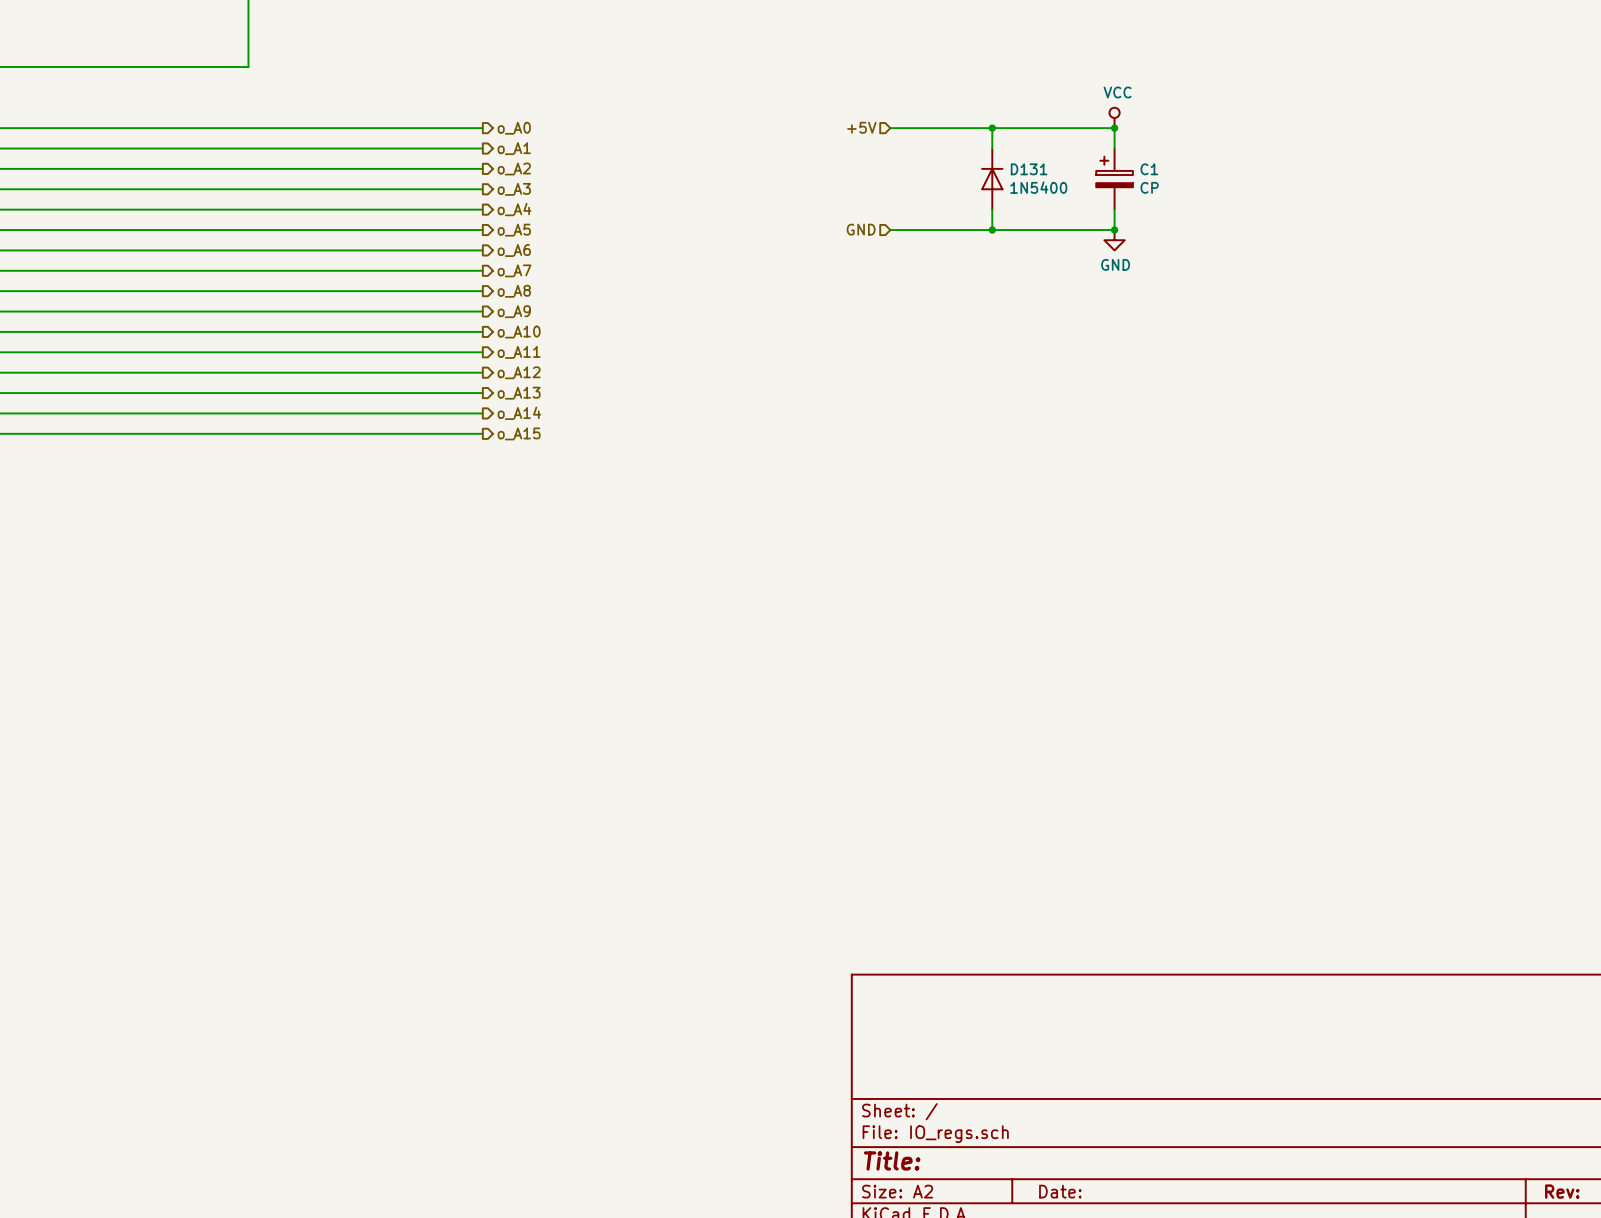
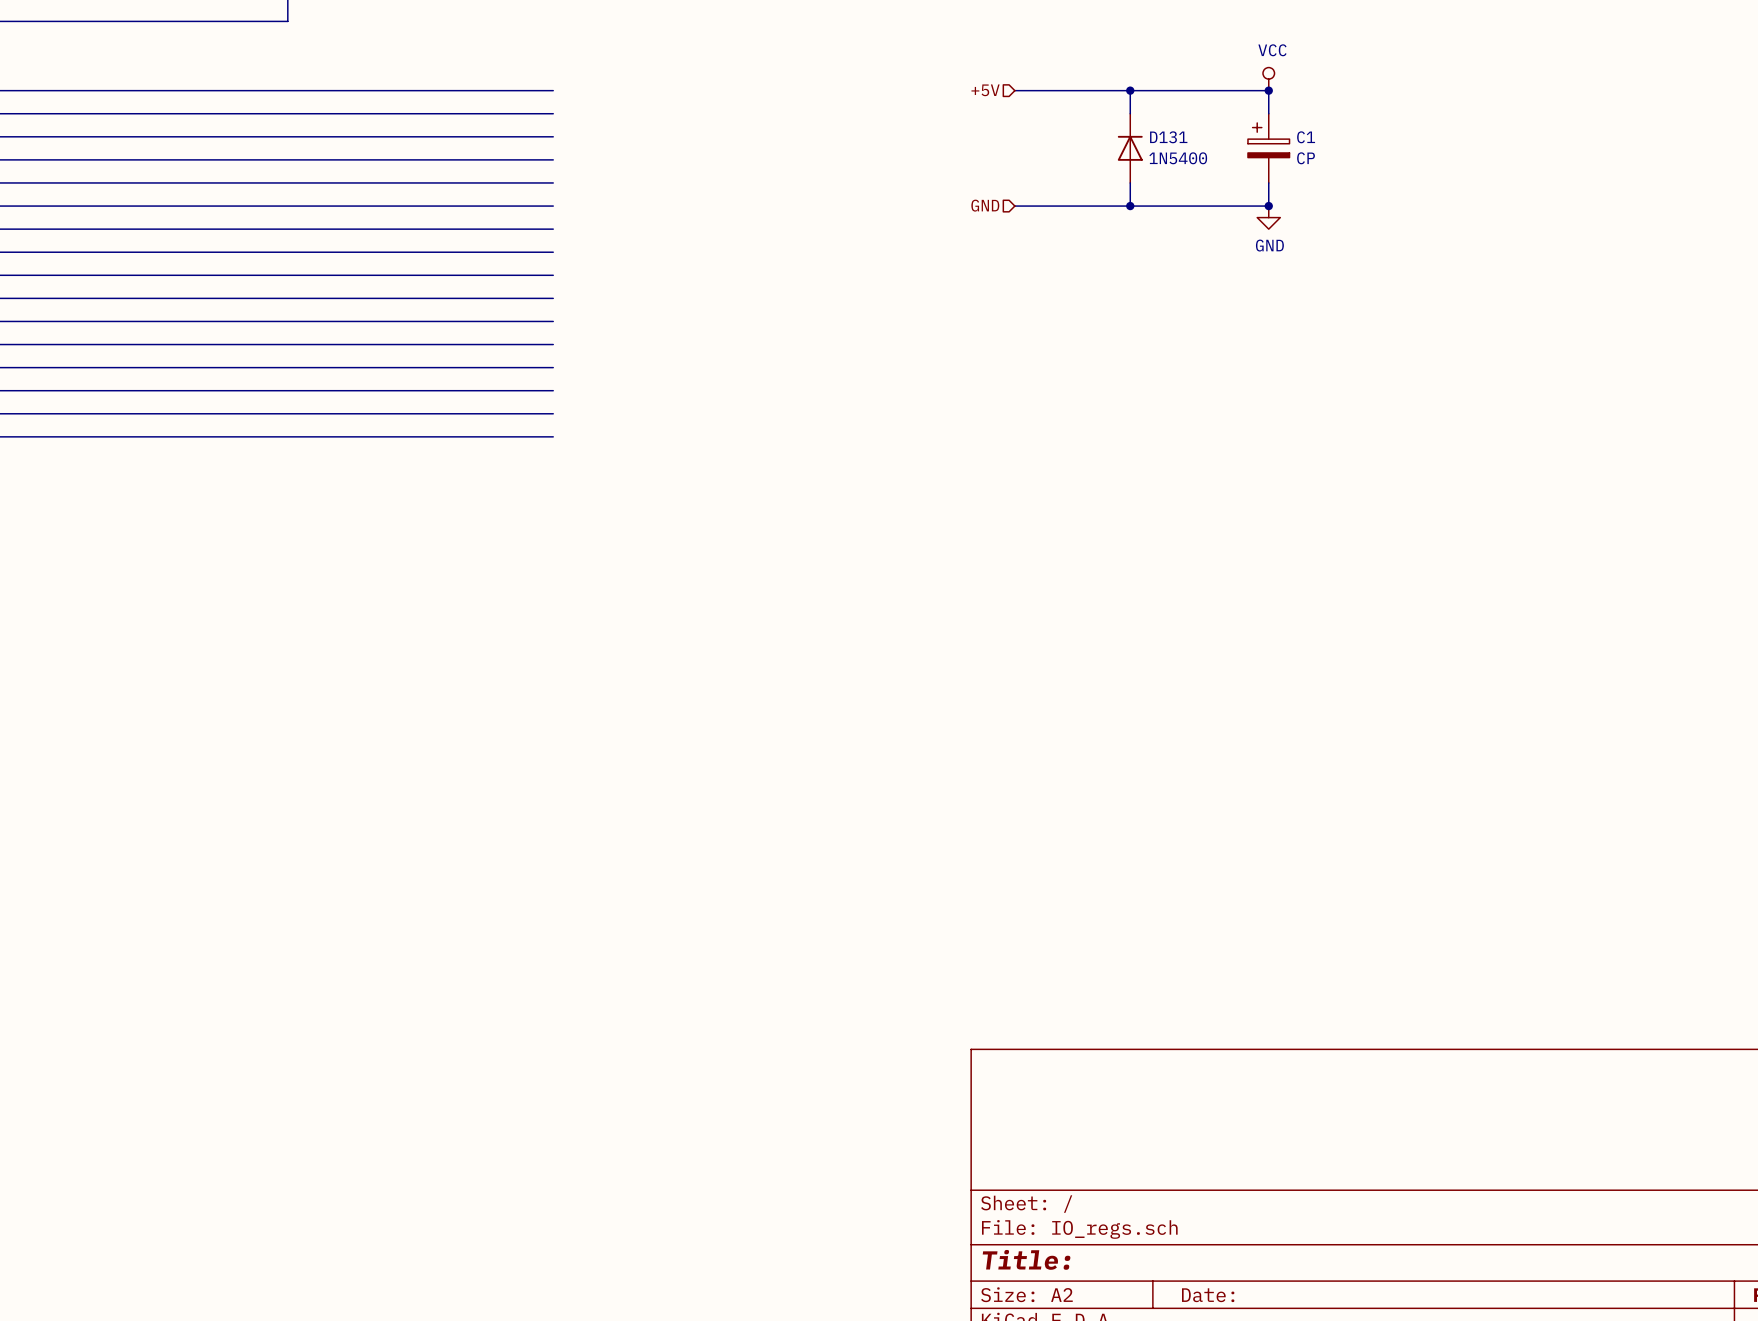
hierarchical label: o_A0 (514, 128) -> none
hierarchical label: o_A1 (514, 148) -> none
hierarchical label: o_A2 (514, 169) -> none
hierarchical label: o_A3 (514, 189) -> none
hierarchical label: o_A4 (514, 209) -> none
hierarchical label: o_A5 (514, 230) -> none
hierarchical label: o_A6 (514, 250) -> none
hierarchical label: o_A7 (514, 270) -> none
hierarchical label: o_A8 (514, 291) -> none
hierarchical label: o_A9 (514, 311) -> none
hierarchical label: o_A10 (519, 332) -> none
hierarchical label: o_A11 (519, 352) -> none
hierarchical label: o_A12 (519, 372) -> none
hierarchical label: o_A13 (519, 393) -> none
hierarchical label: o_A14 (519, 413) -> none
hierarchical label: o_A15 (519, 433) -> none

